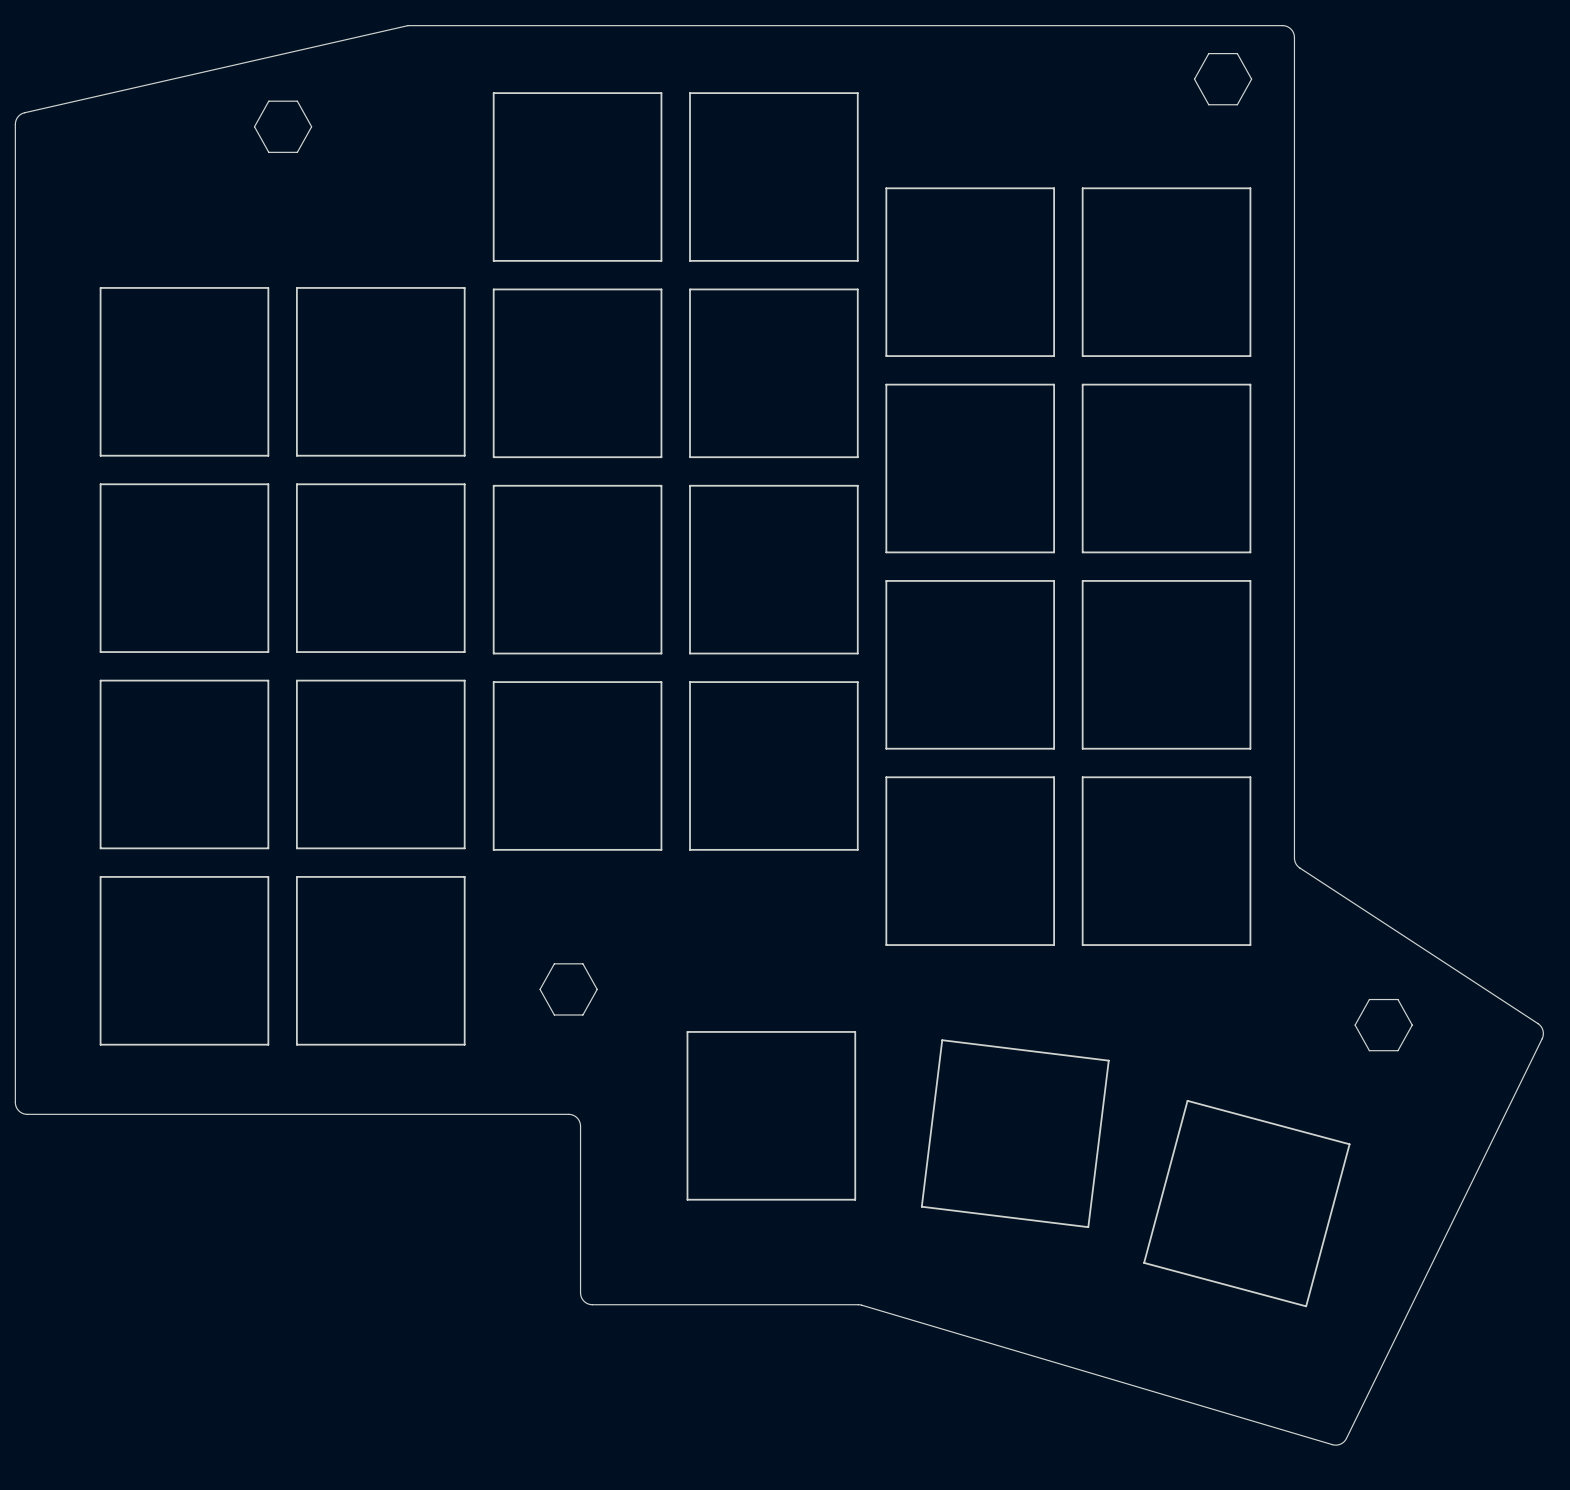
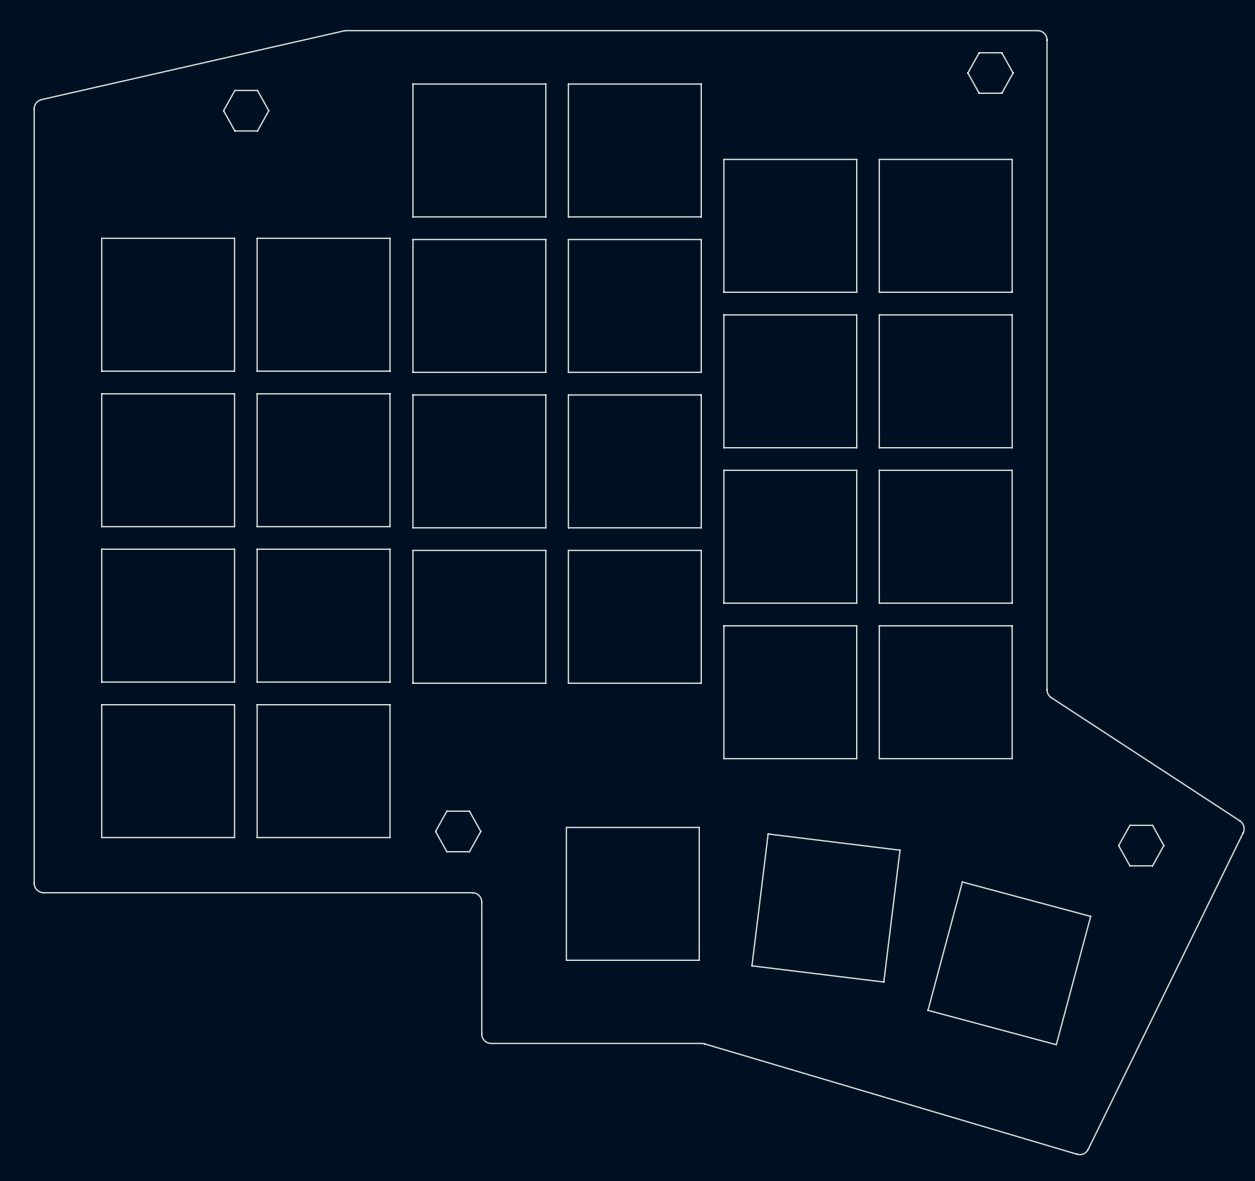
drawing position: (568, 989) -> (458, 831)
drawing position: (1383, 1025) -> (1141, 845)

